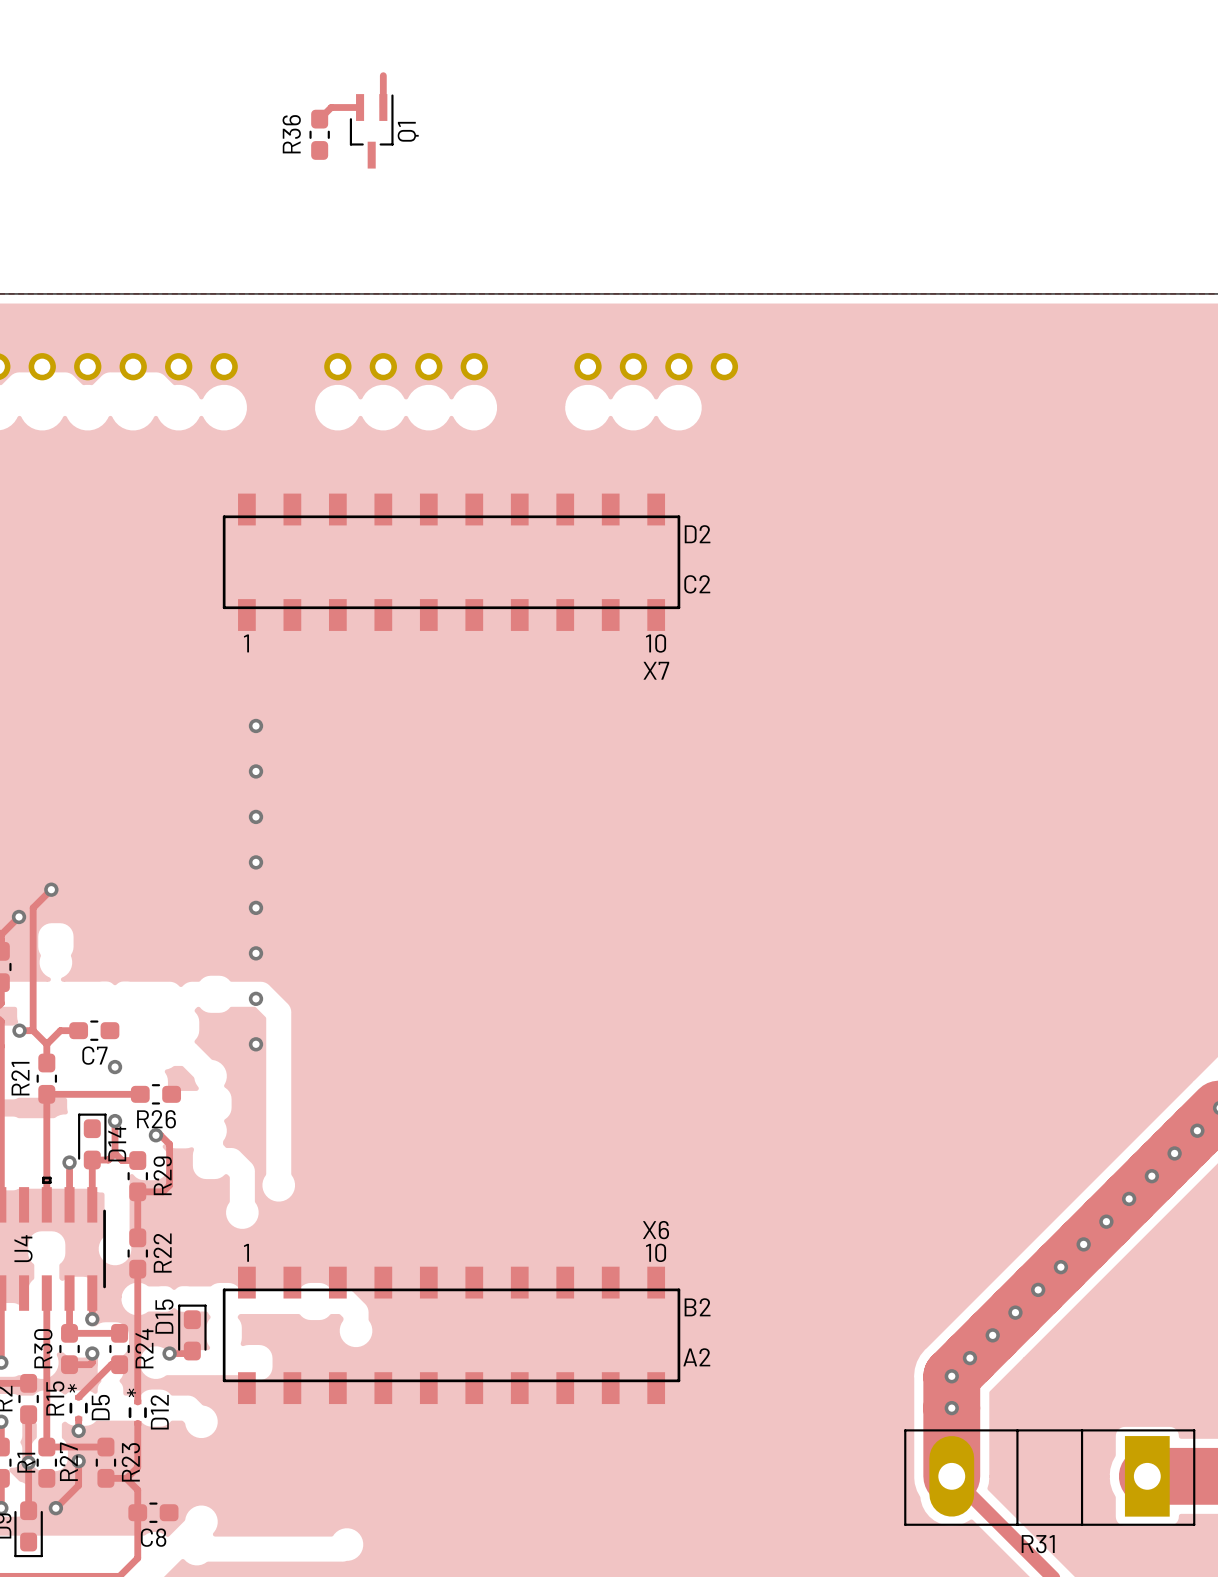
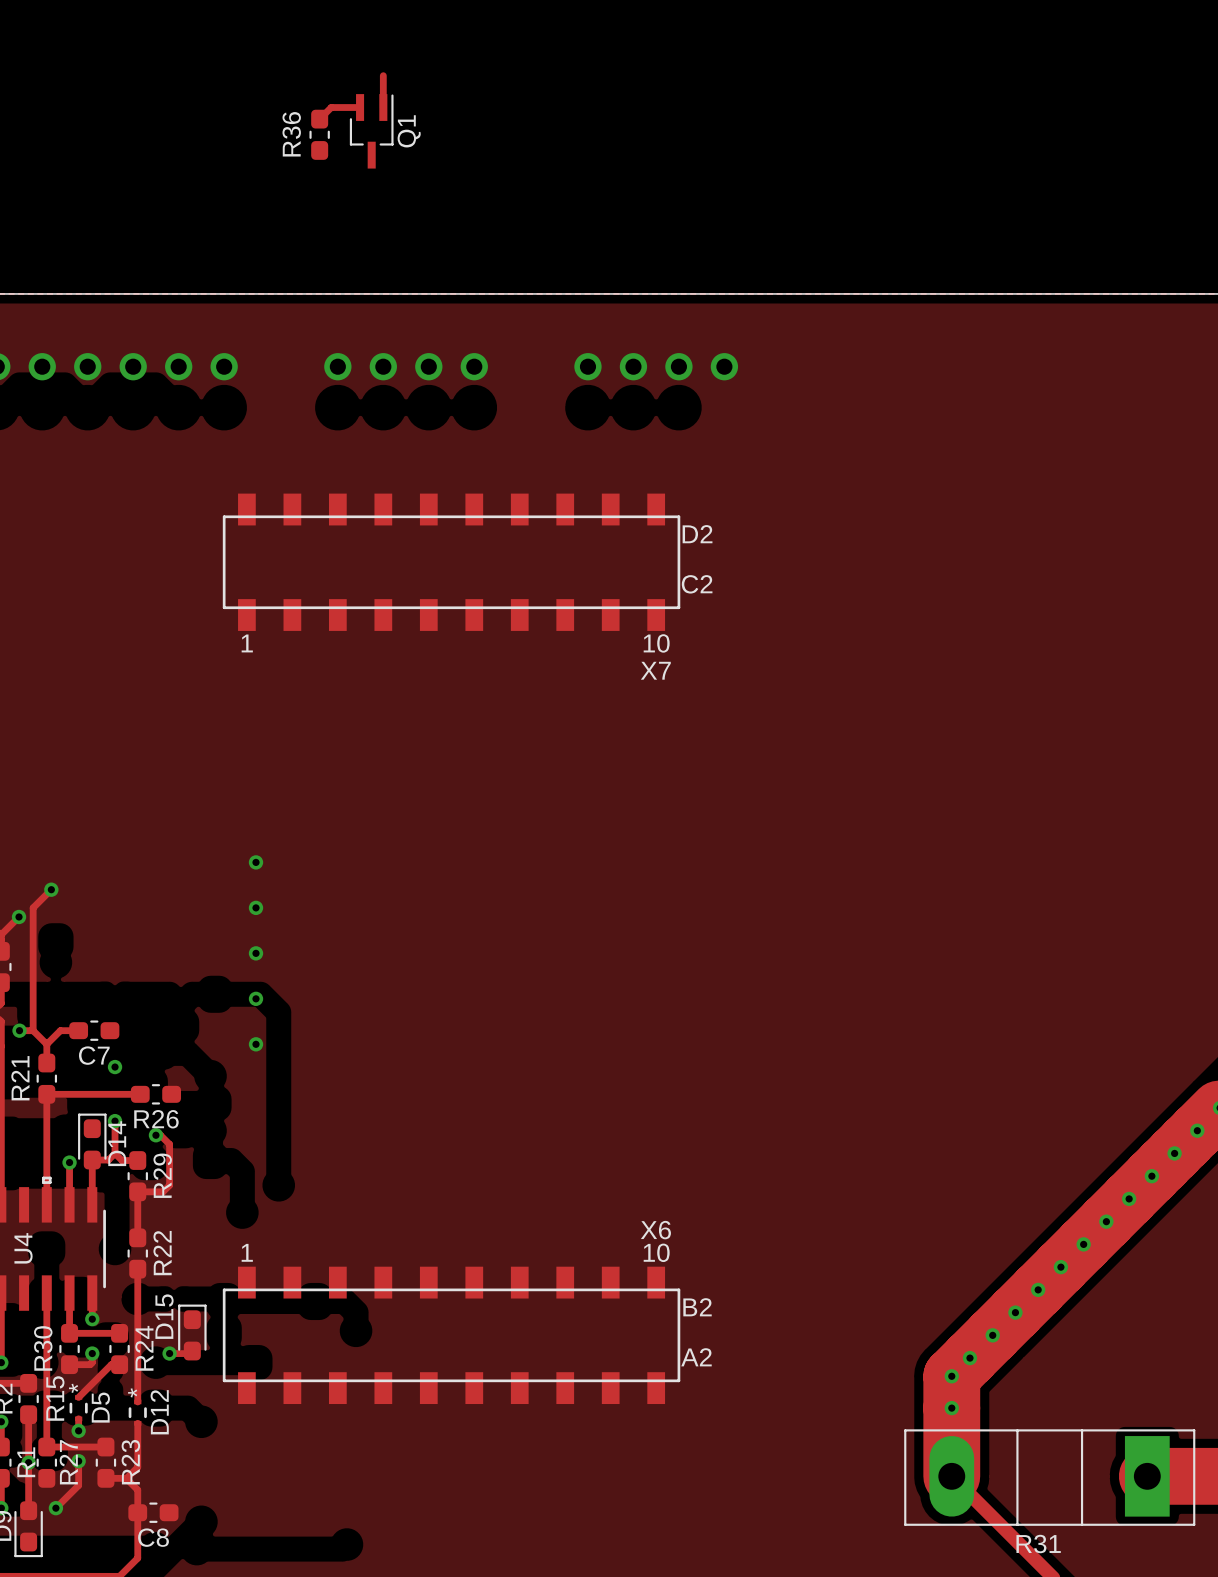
via: (256, 725) -> none
via: (256, 771) -> none
via: (256, 816) -> none

